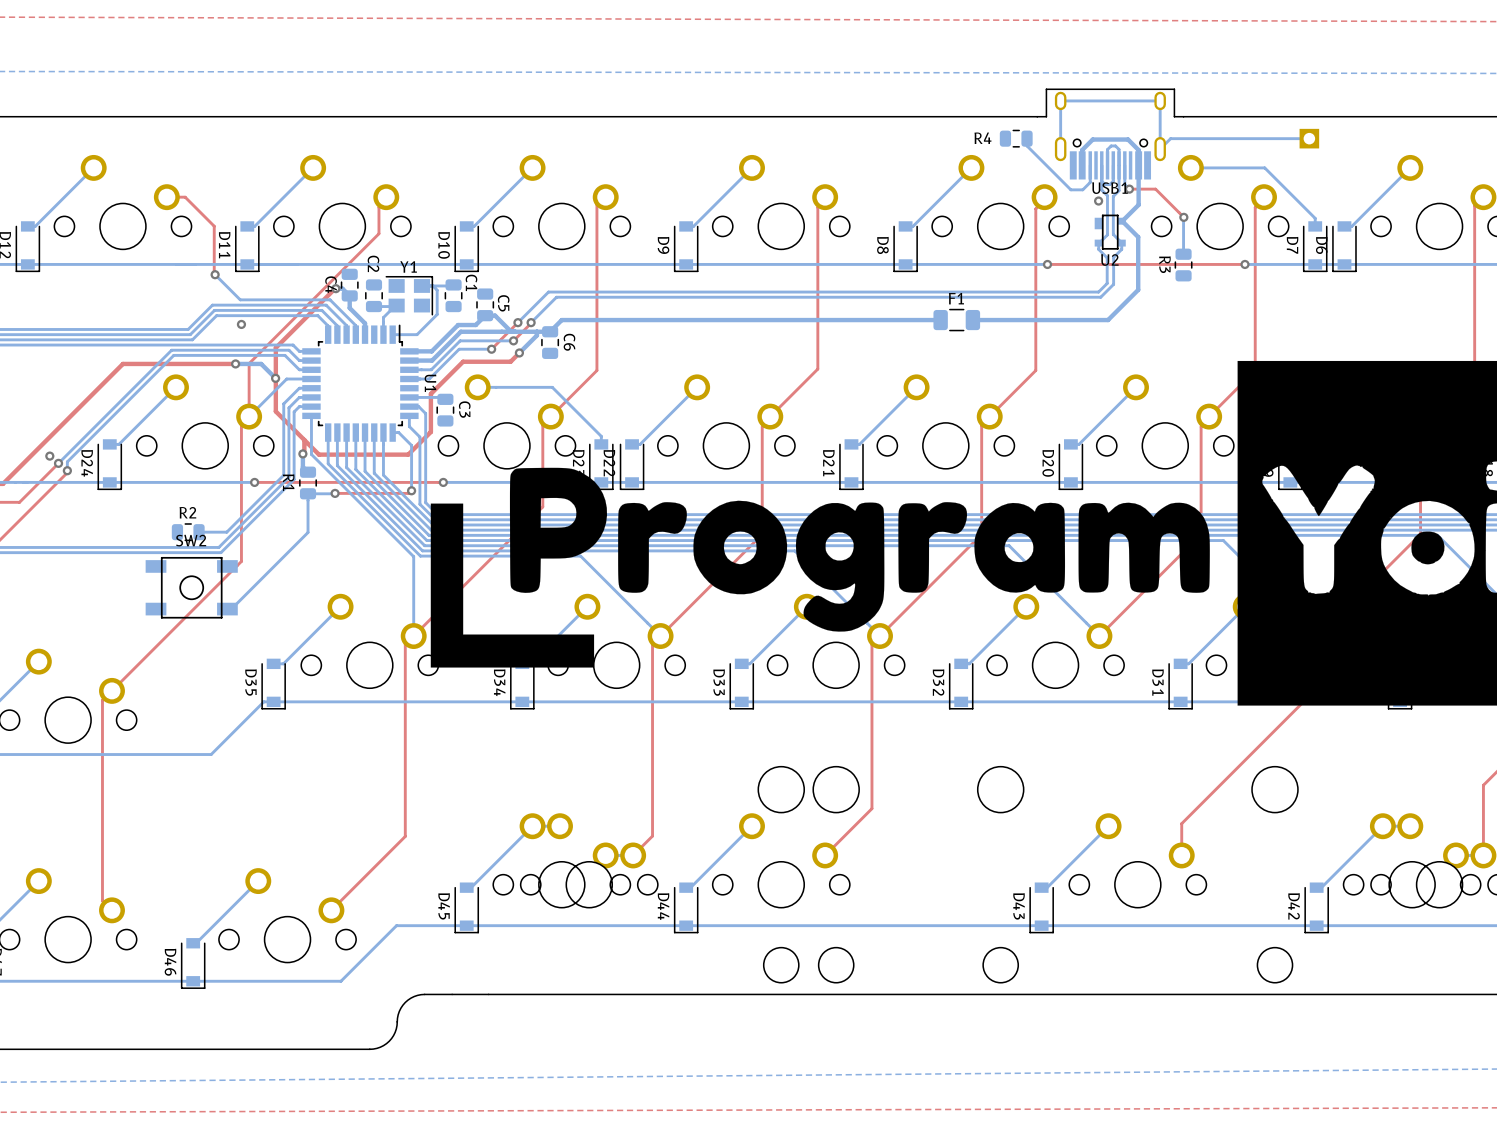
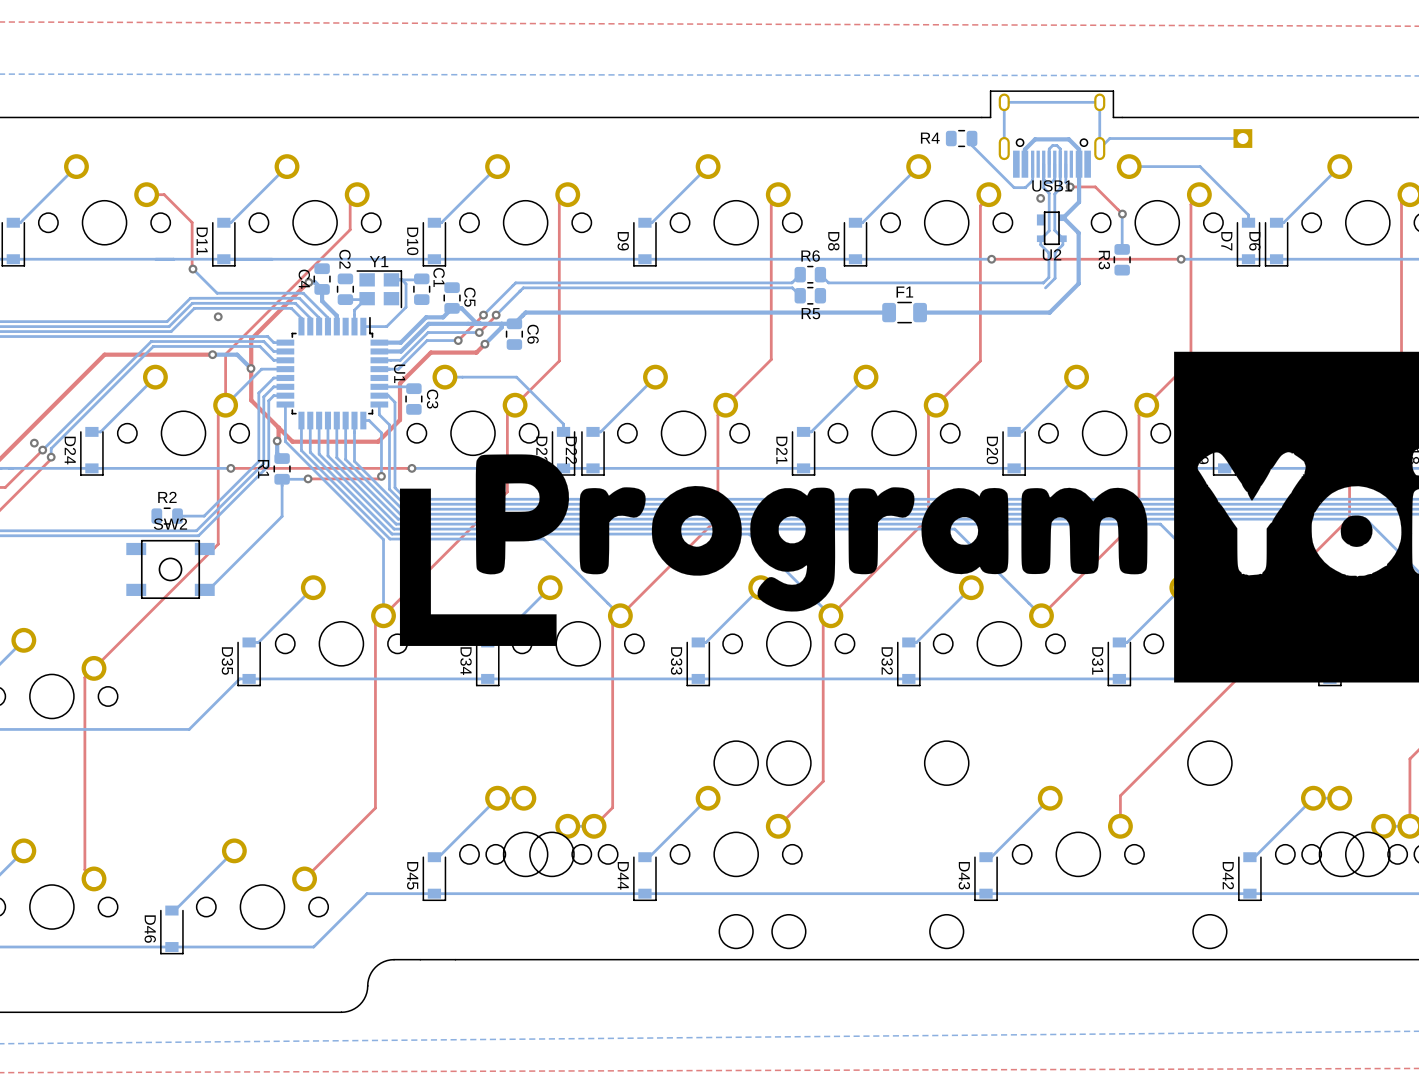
R6: none -> (810, 274)
bottom track: none -> (820, 274) (828, 282) (1043, 282)
bottom track: (1101, 289) (1098, 292) (548, 292) -> (800, 274) (792, 282) (515, 282) (512, 285)
bottom track: (1103, 294) (1100, 297) (556, 297) -> (800, 295) (792, 287) (523, 287) (520, 290)
R5: none -> (810, 295)

